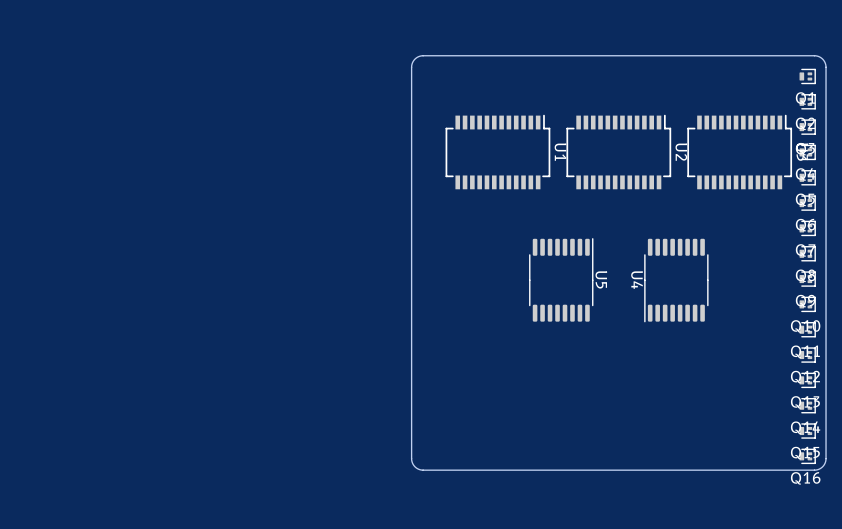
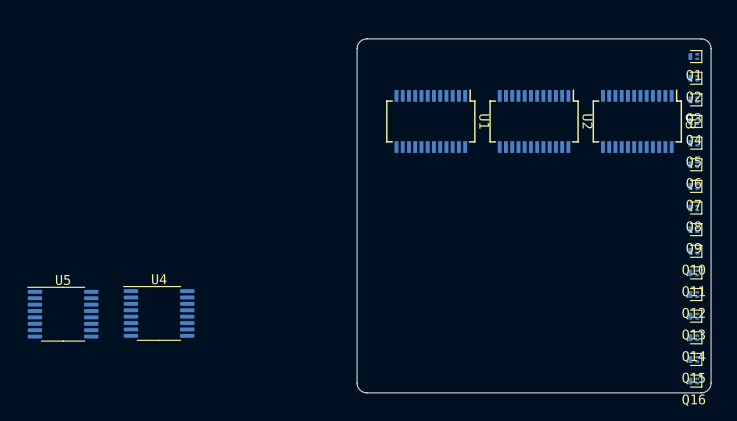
U5 rotation: 0° (561, 279) -> 90° counterclockwise (62, 314)
U5 position: (561, 279) -> (62, 314)
U4 rotation: 0° (676, 280) -> 90° clockwise (158, 313)
U4 position: (676, 280) -> (158, 313)

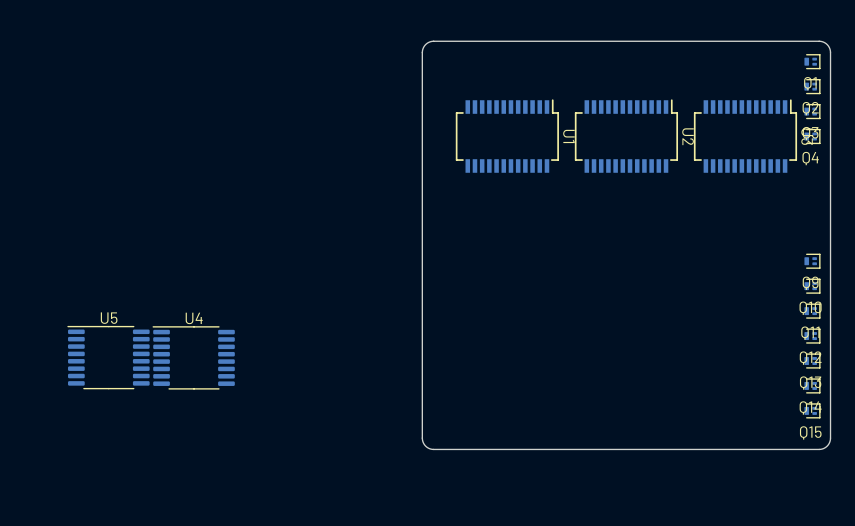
Q5: (695, 143) -> none
Q6: (695, 164) -> none
Q7: (695, 186) -> none
Q8: (695, 208) -> none
U5 position: (62, 314) -> (108, 357)
Q16: (695, 381) -> none

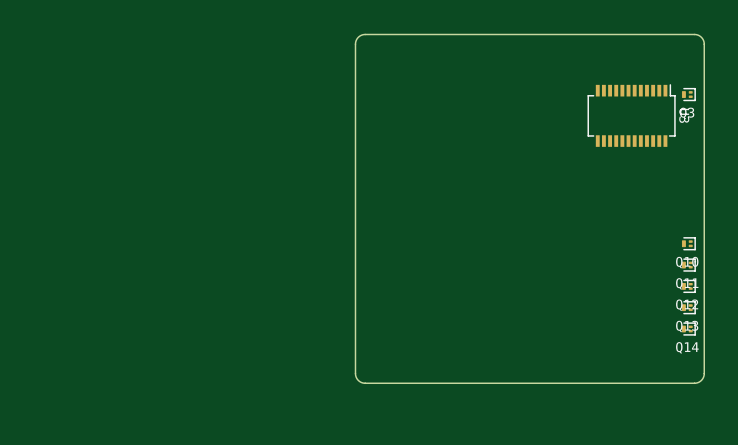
Q1: (812, 61) -> none
Q2: (812, 86) -> none
U1: (507, 136) -> none
U2: (626, 136) -> none
Q4: (812, 136) -> none
Q9: (812, 261) -> none
U5: (108, 357) -> none
U4: (193, 357) -> none
Q15: (812, 410) -> none

